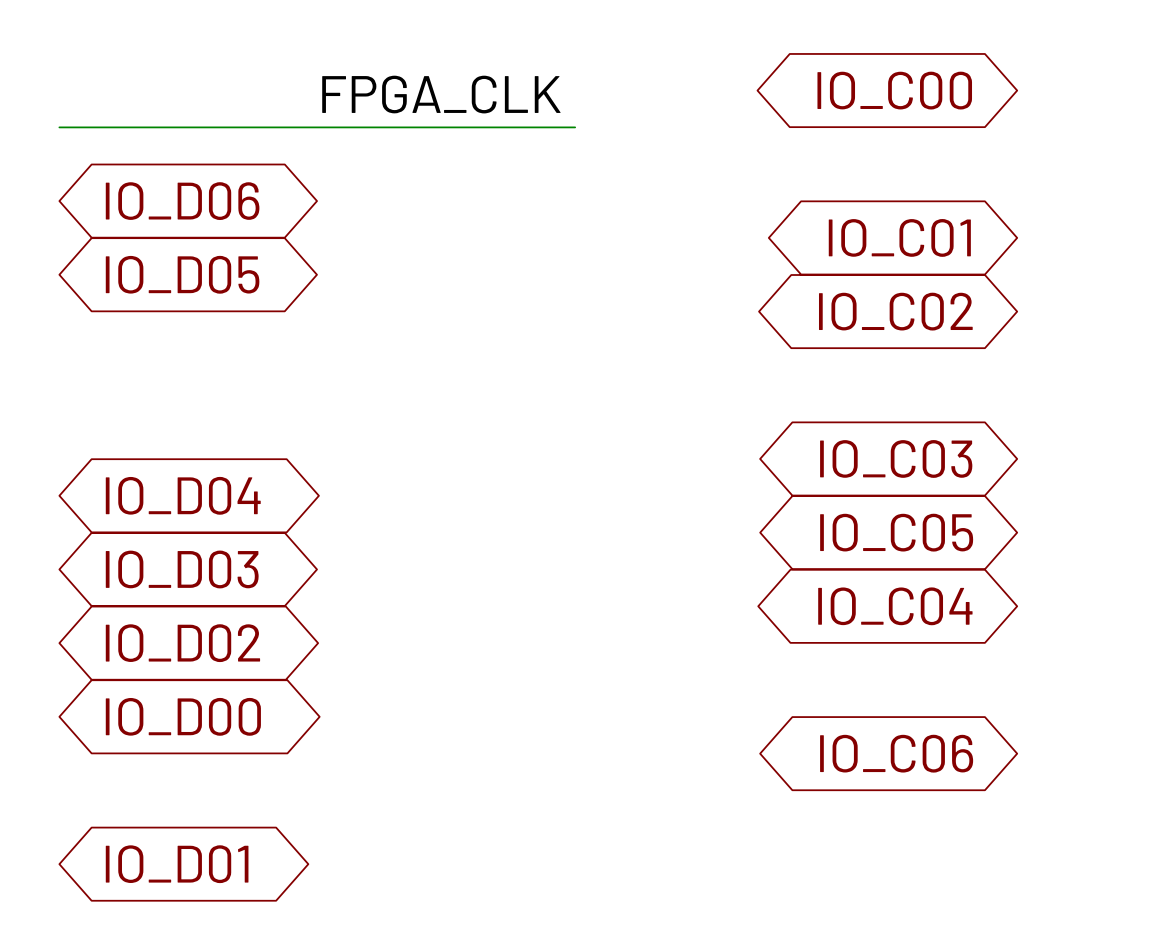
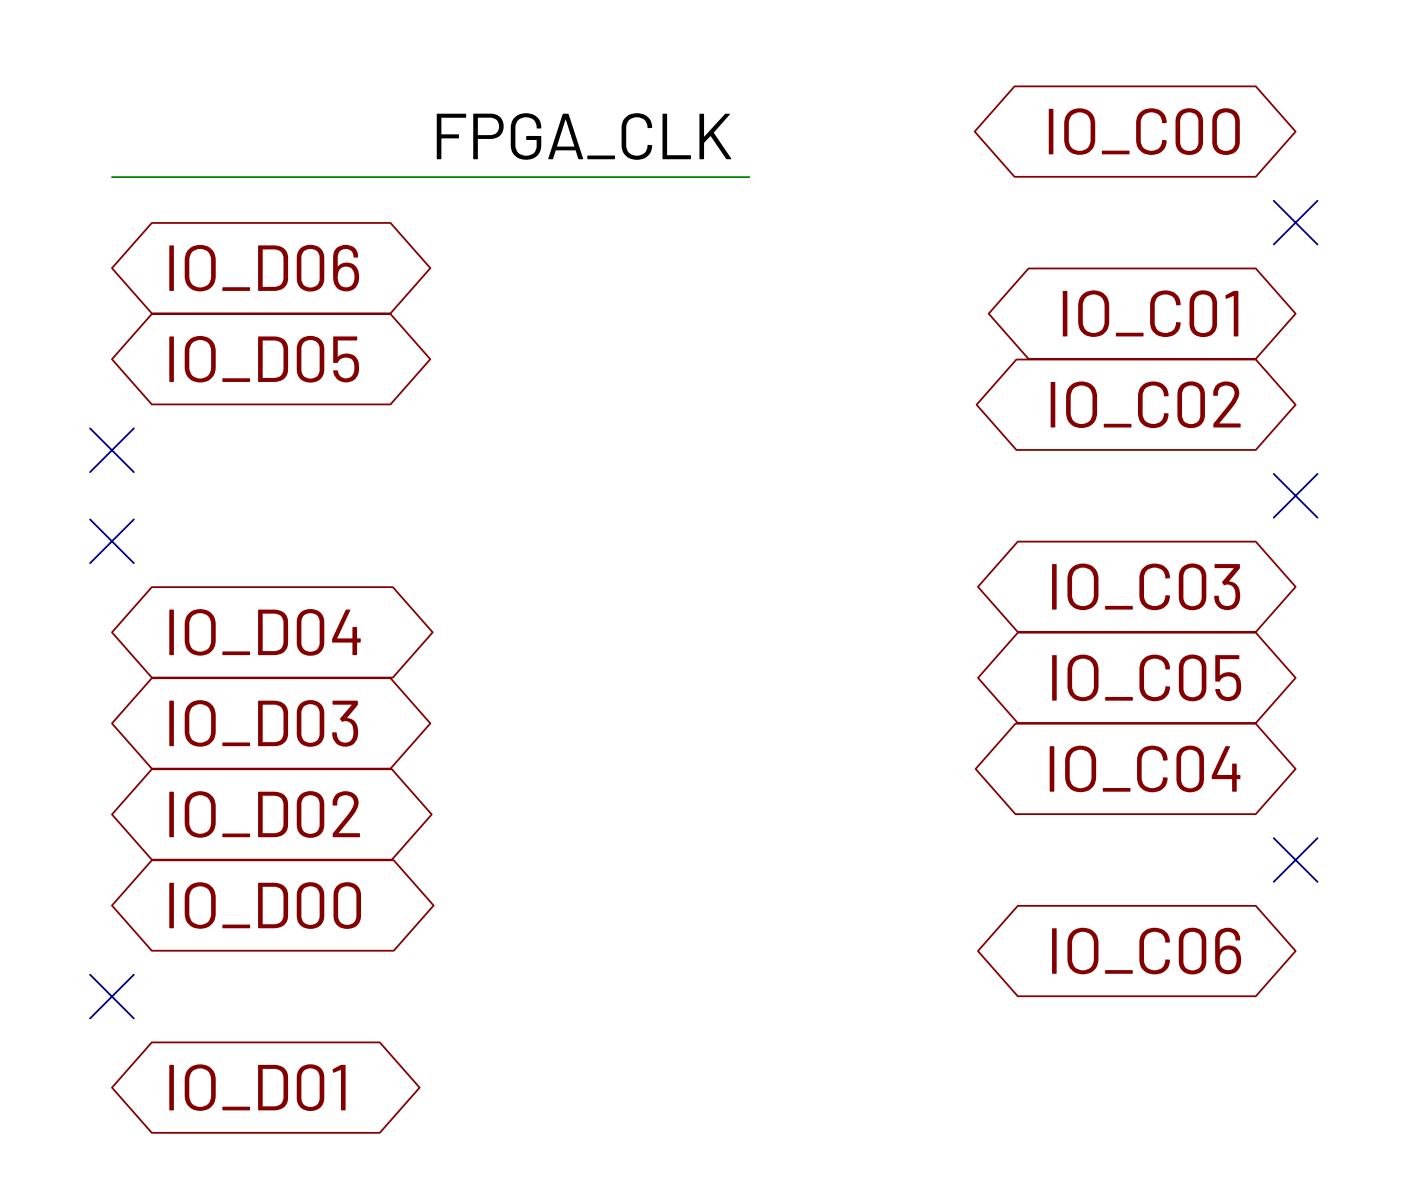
no-connect mark: none -> (1295, 222)
no-connect mark: none -> (111, 450)
no-connect mark: none -> (1295, 495)
no-connect mark: none -> (111, 541)
no-connect mark: none -> (1295, 859)
no-connect mark: none -> (111, 996)

